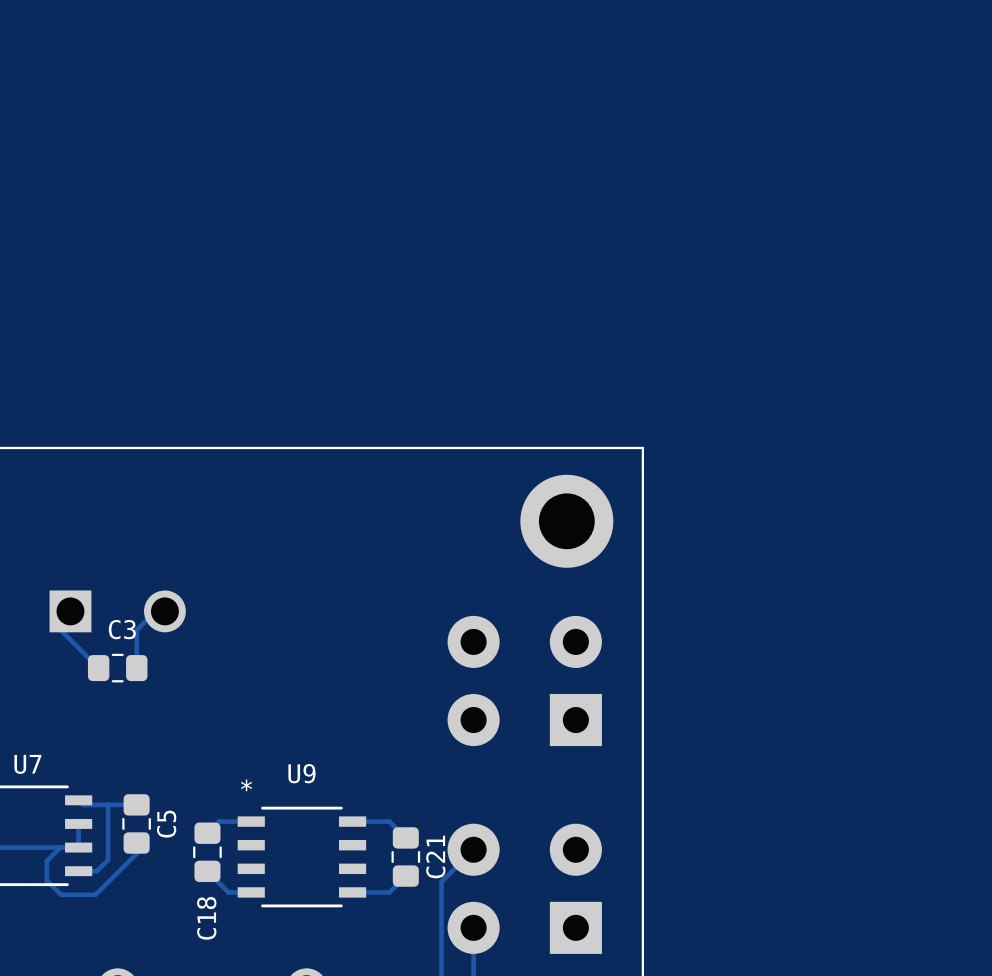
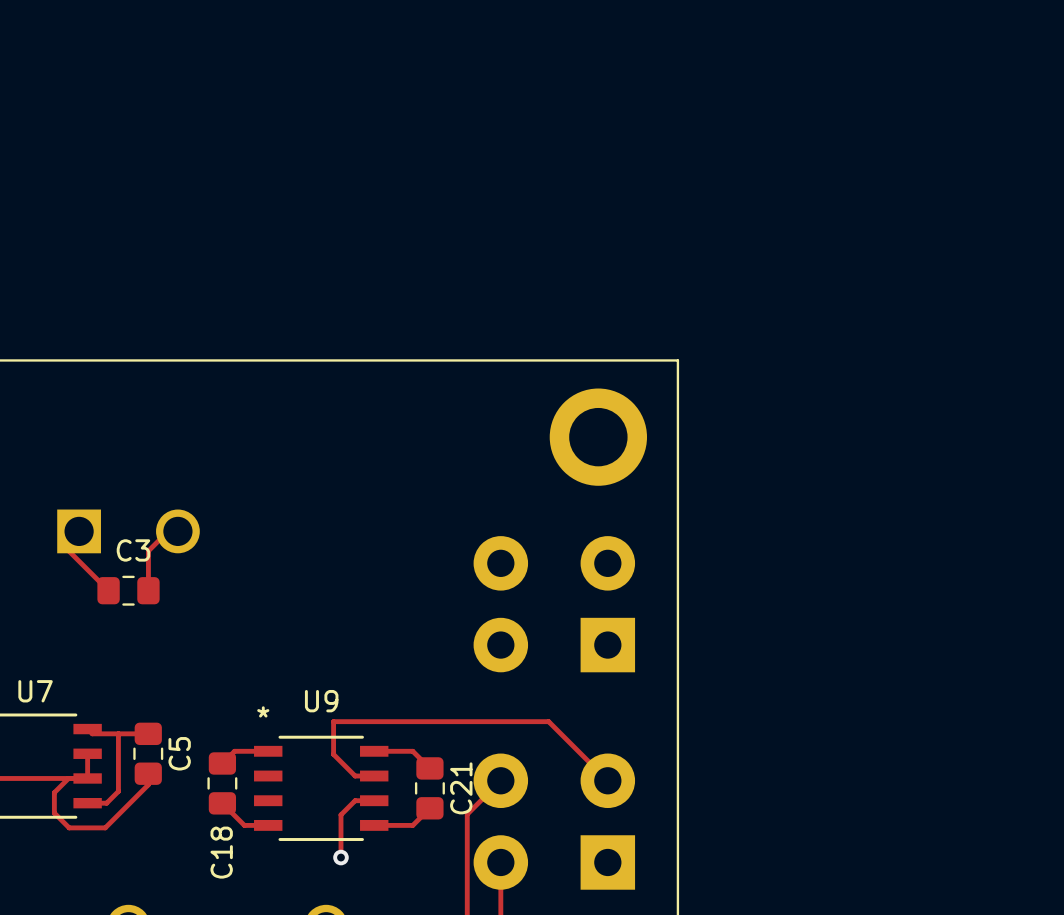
track: none -> (374, 776) (355, 776) (333, 754) (333, 721) (548, 721) (607, 780)
track: none -> (374, 800) (355, 800) (340, 814) (340, 857)
via: none -> (340, 857)

